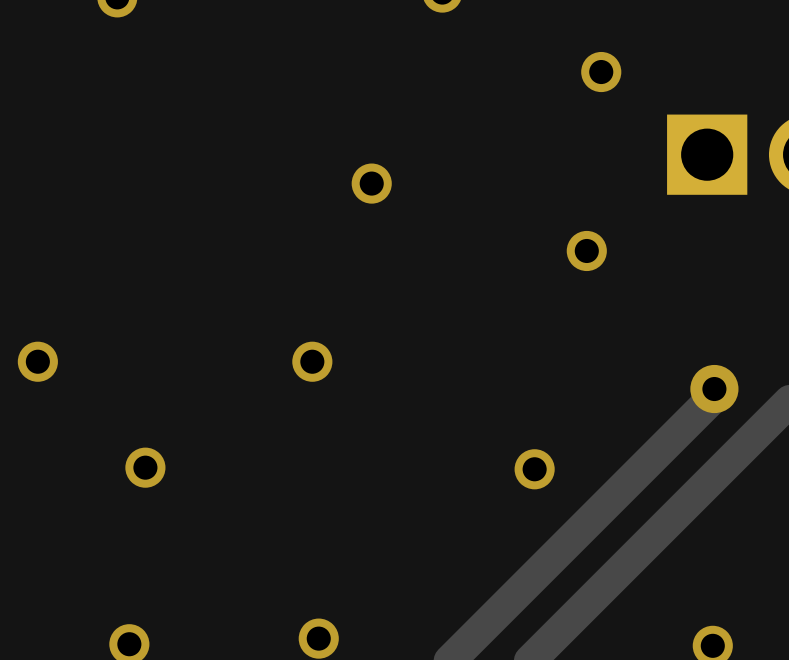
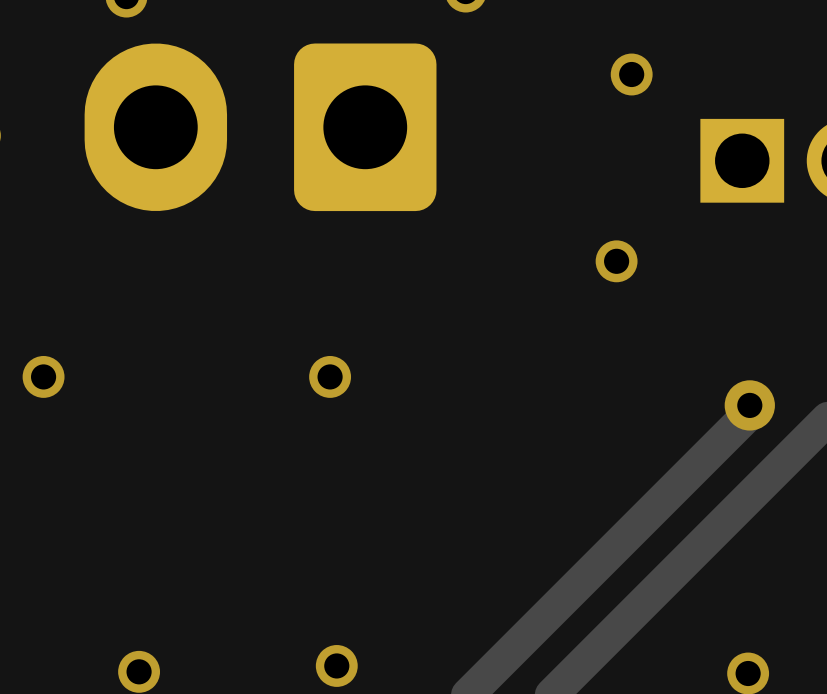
part: none -> (260, 127)
via: (371, 183) -> none
via: (145, 467) -> none
via: (534, 469) -> none

